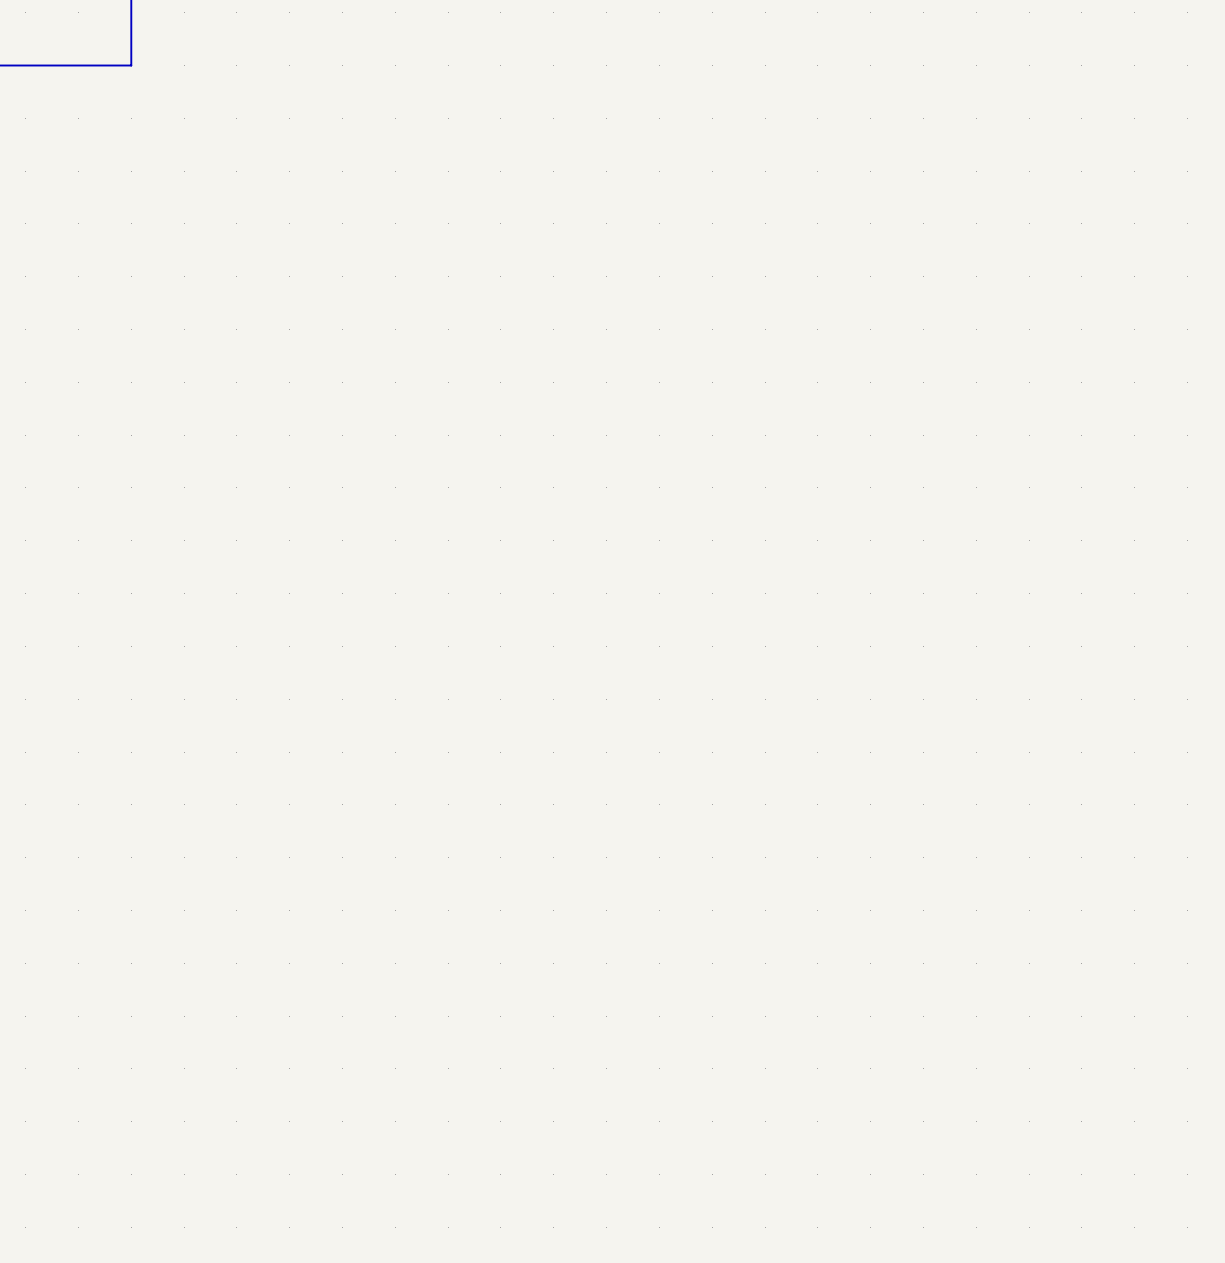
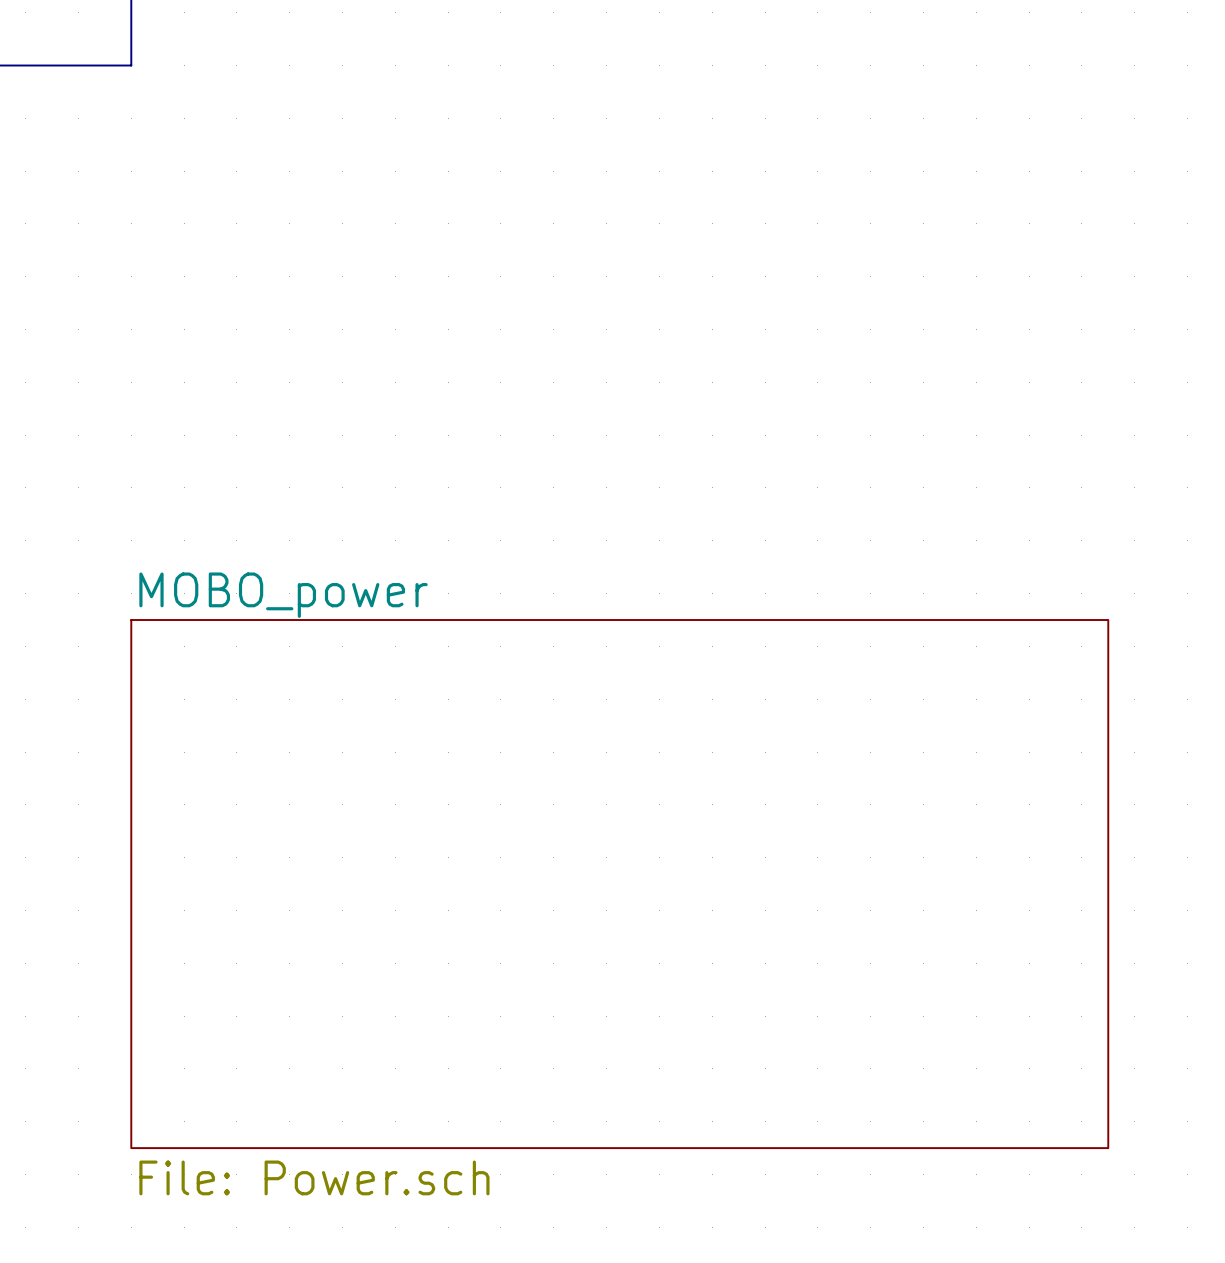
sheet MOBO_power: none -> File: Power.sch (619, 884)

